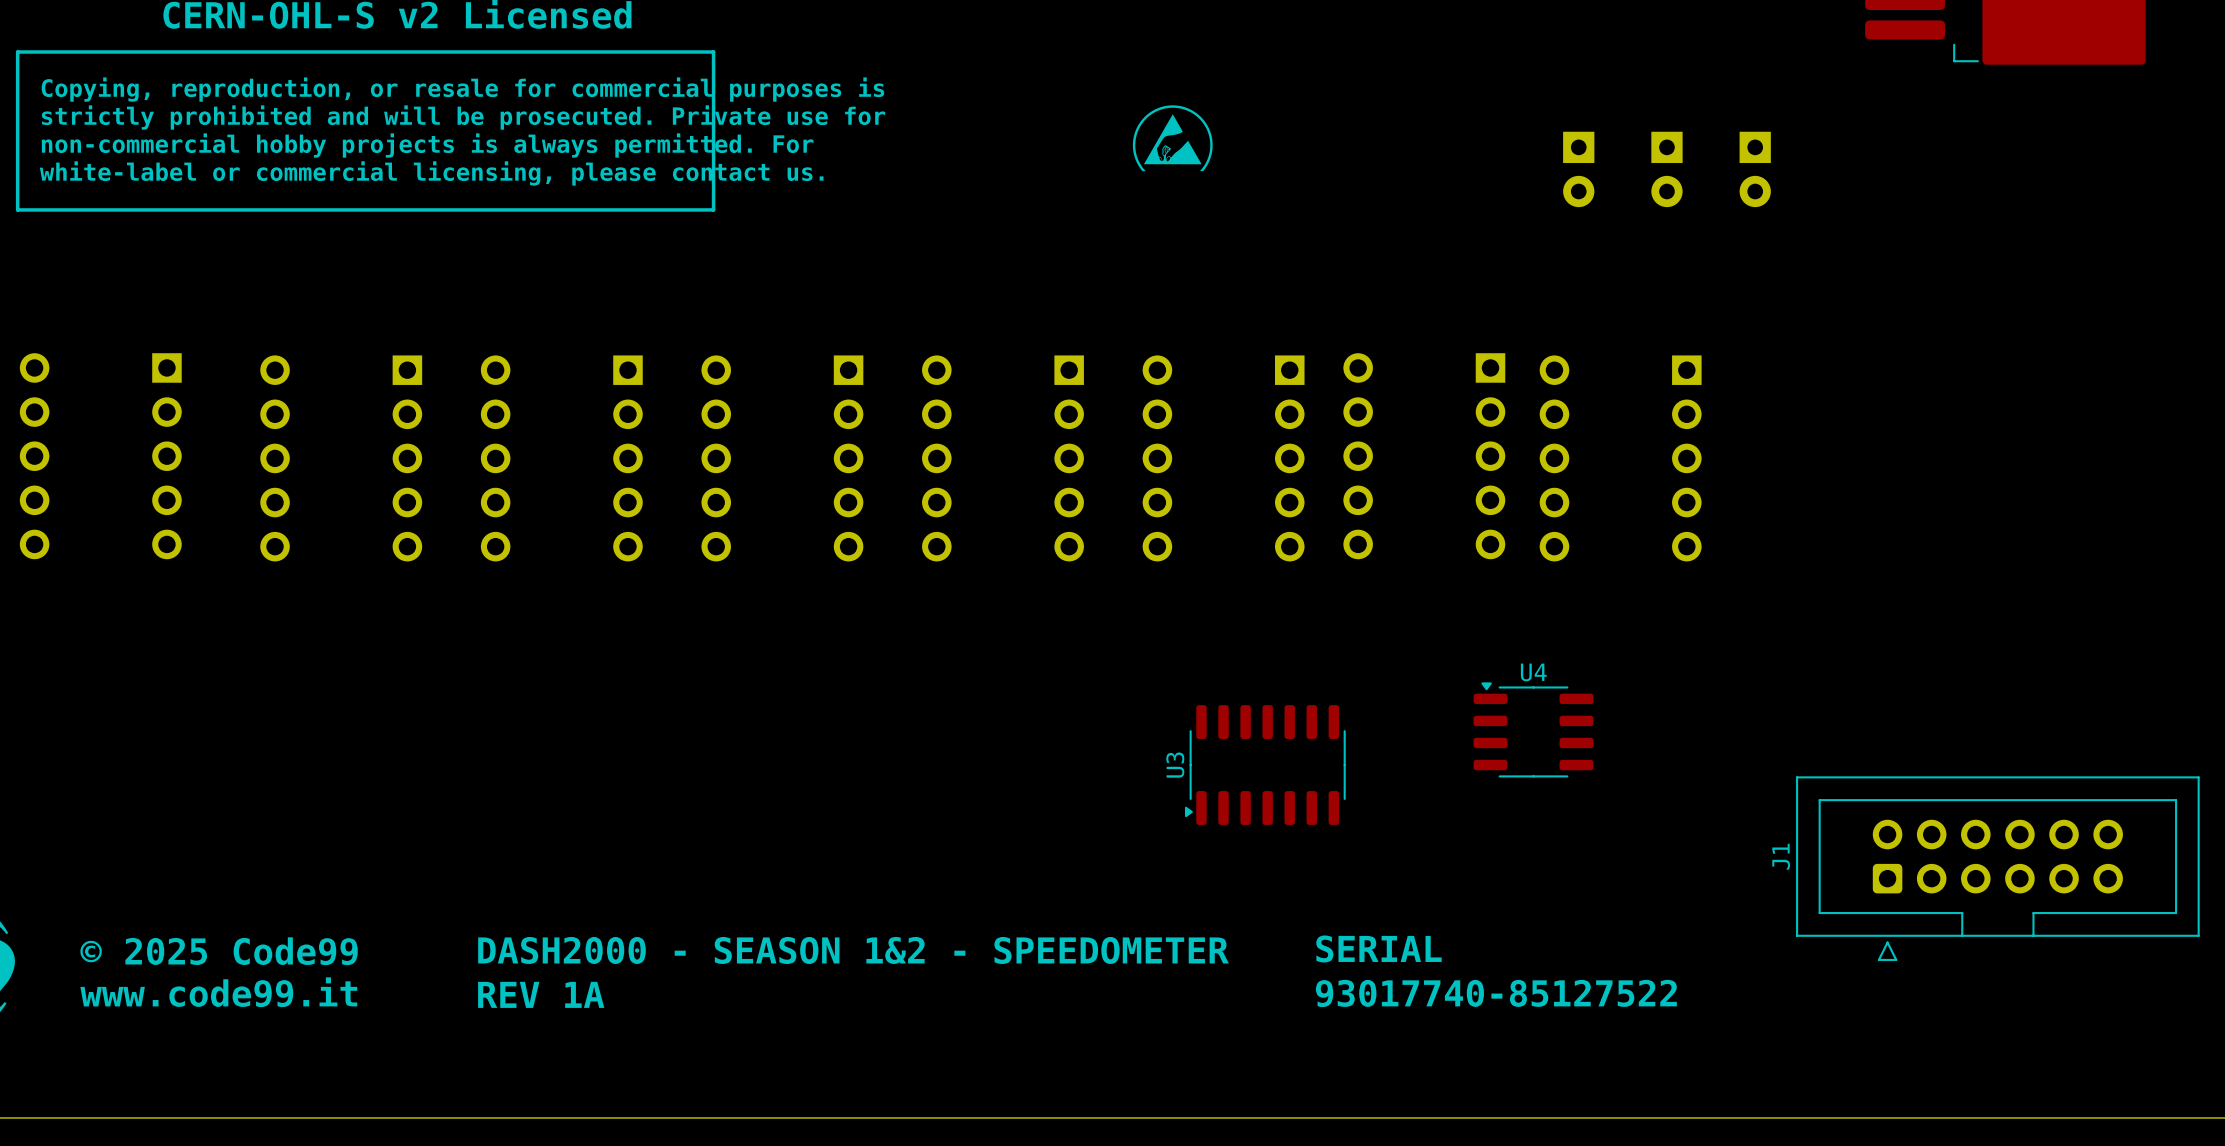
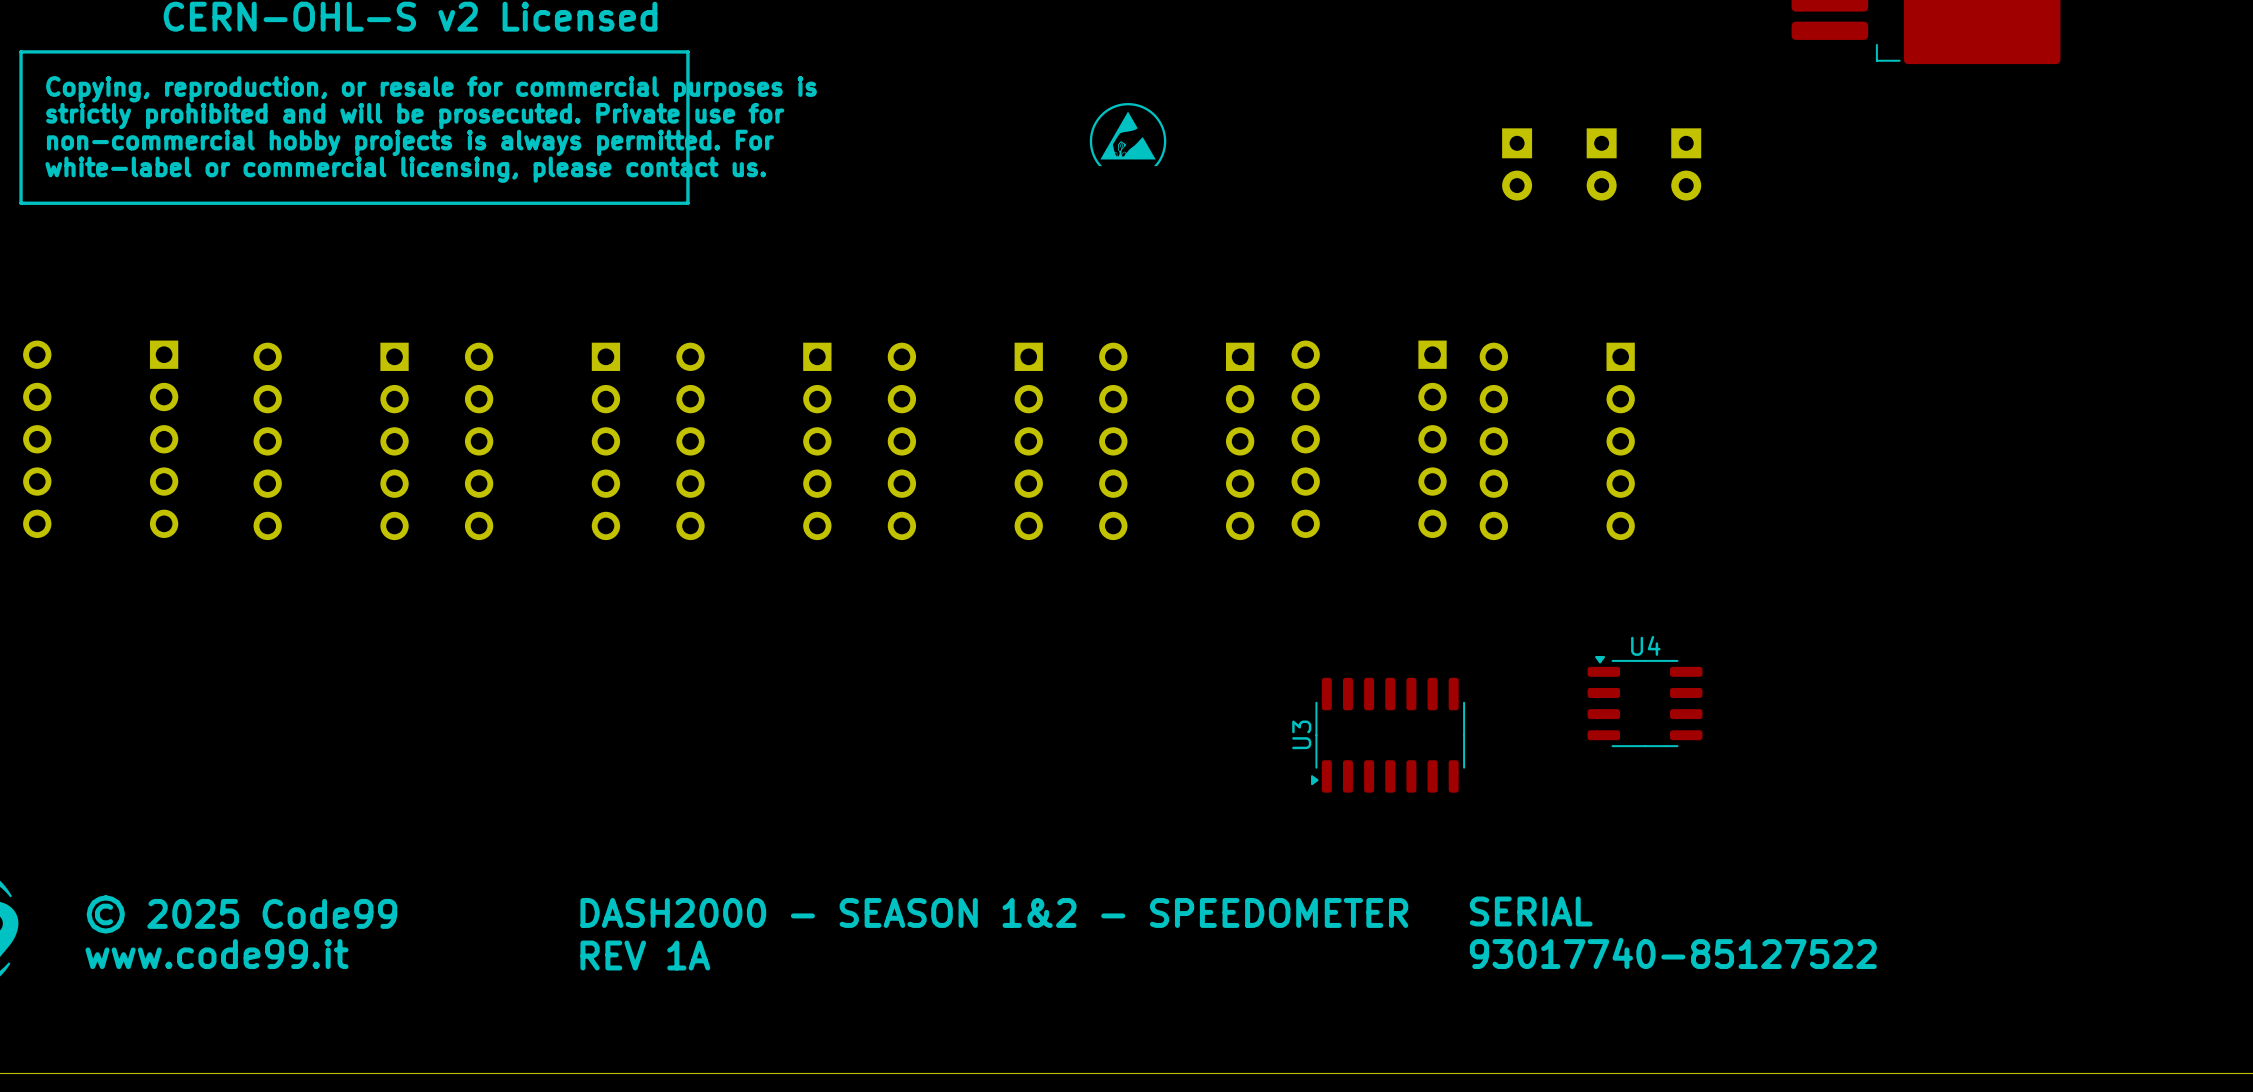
U4 position: (1533, 729) -> (1645, 701)
U3 position: (1265, 765) -> (1388, 735)
J1: (1997, 868) -> none
text position: SERIAL (1378, 948) -> SERIAL (1531, 911)
text position: DASH2000 - SEASON 1&2 - SPEEDOMETER (853, 950) -> DASH2000 - SEASON 1&2 - SPEEDOMETER (994, 912)
text position: 93017740-85127522 (1496, 993) -> 93017740-85127522 (1673, 953)
text position: REV 1A (541, 994) -> REV 1A (645, 955)

